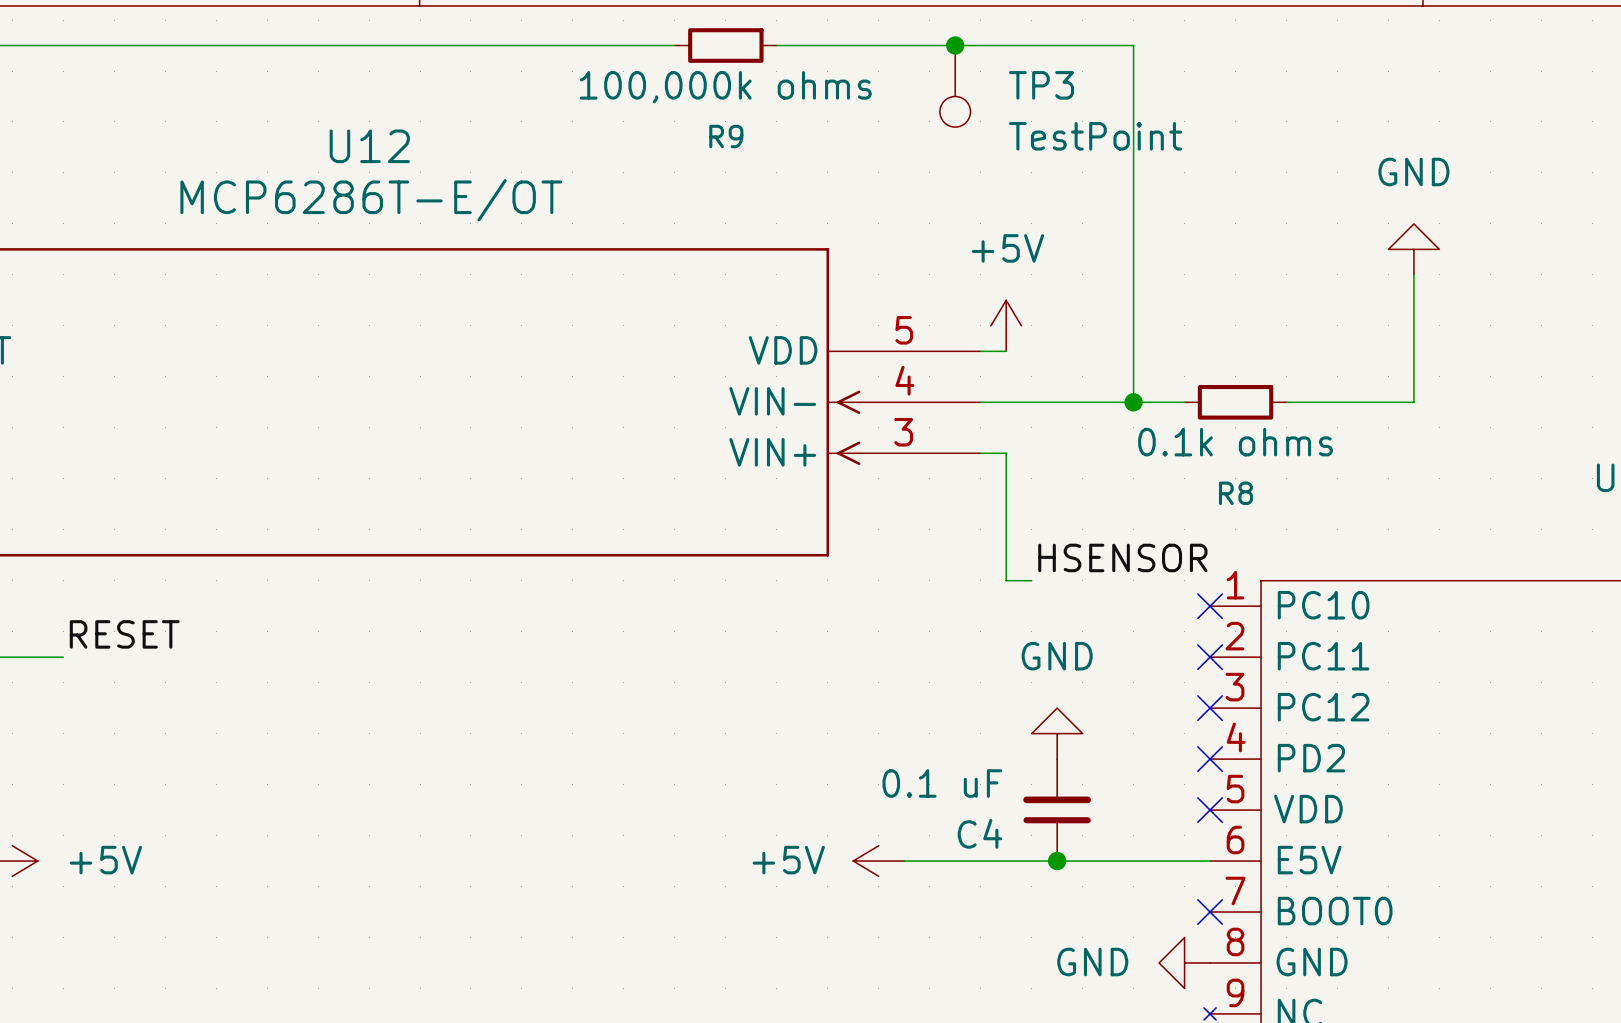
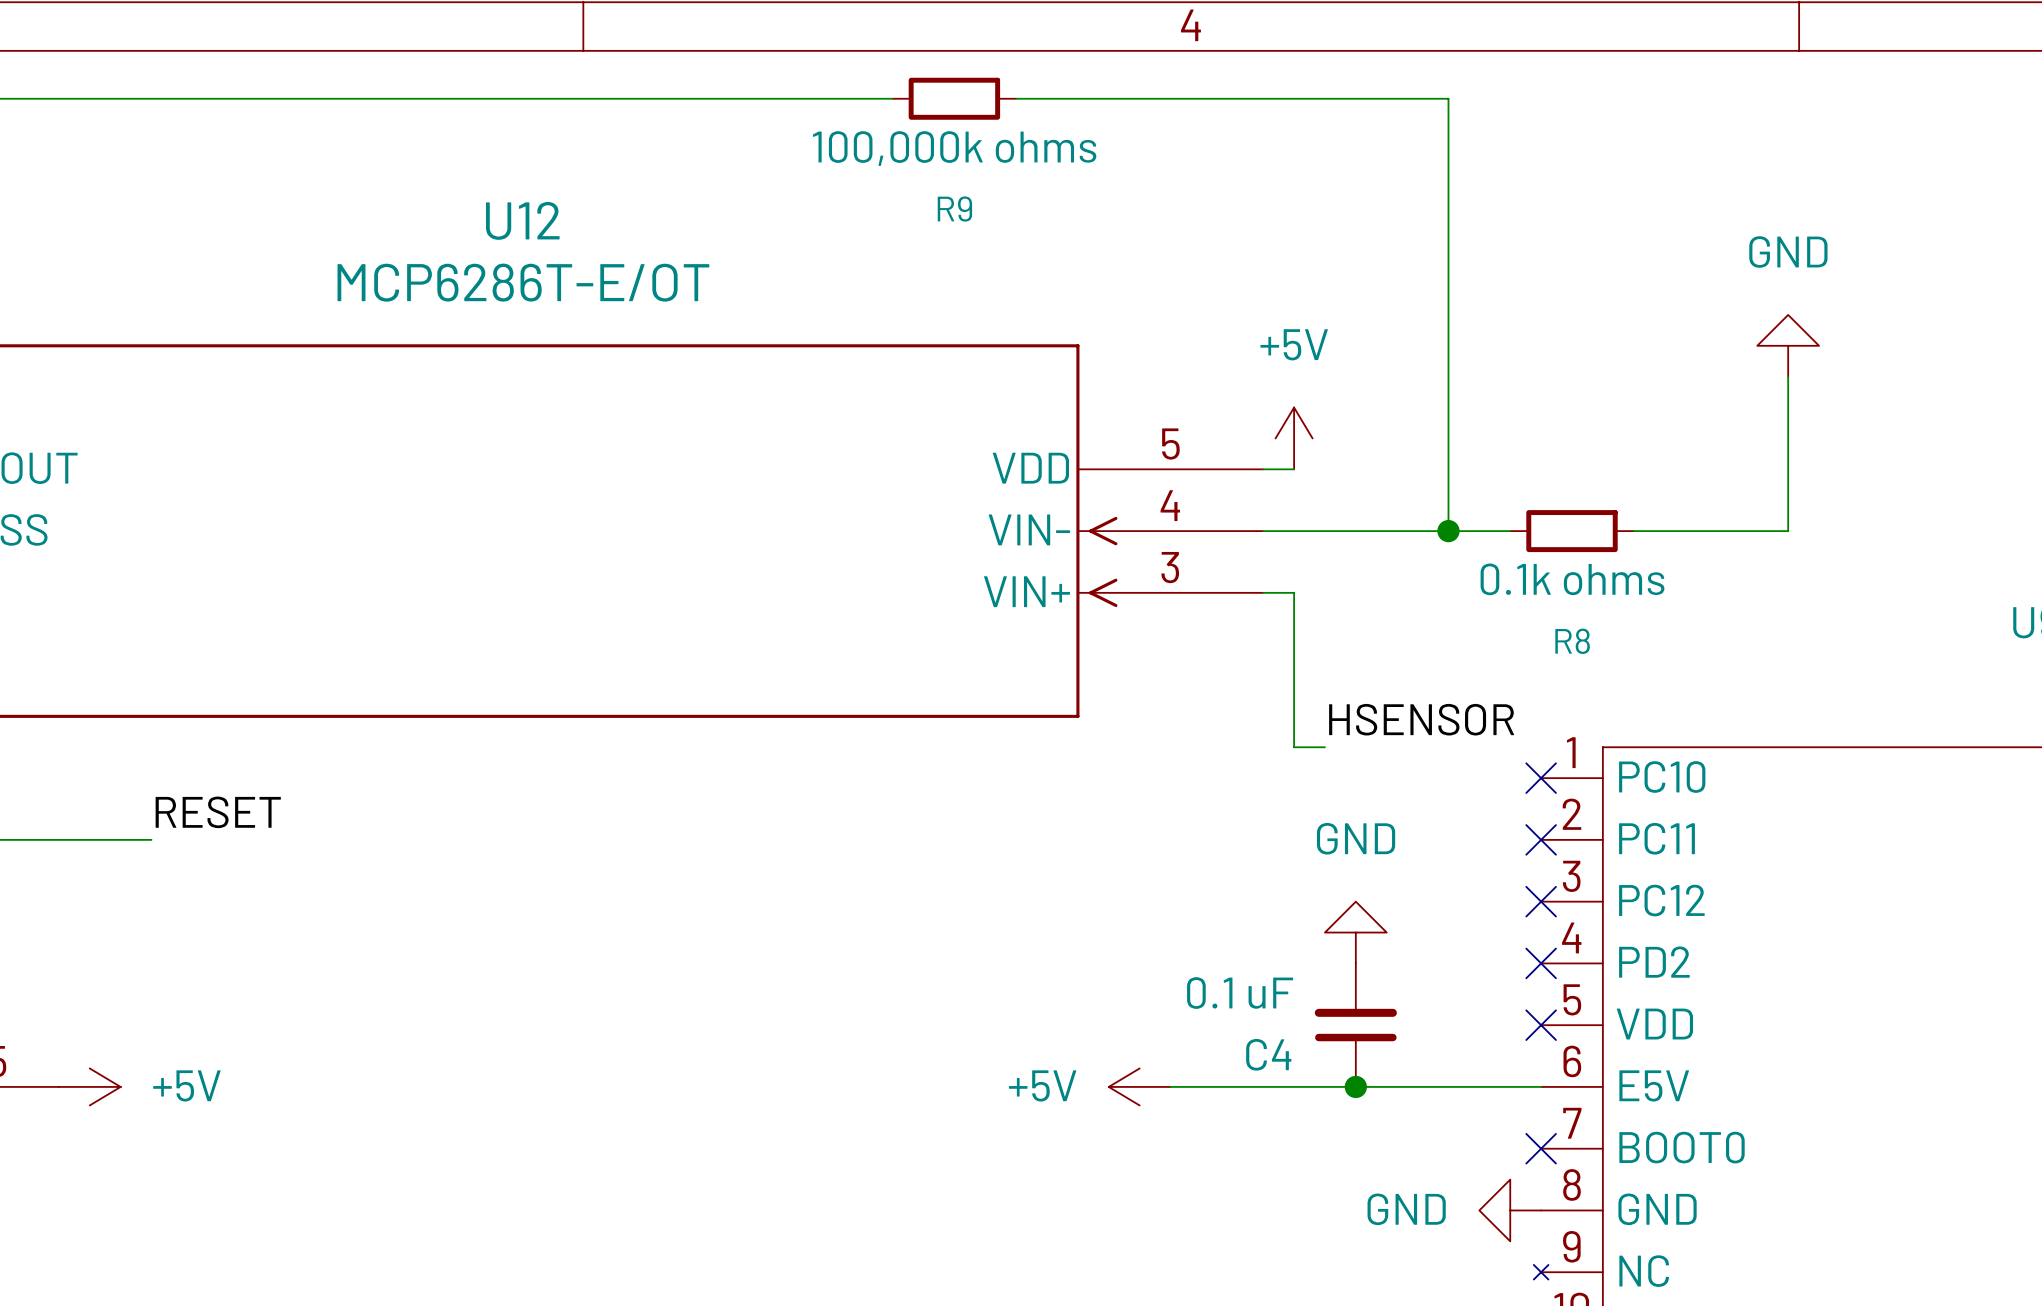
junction: (955, 45) -> none
TP3: TestPoint (955, 86) -> none

